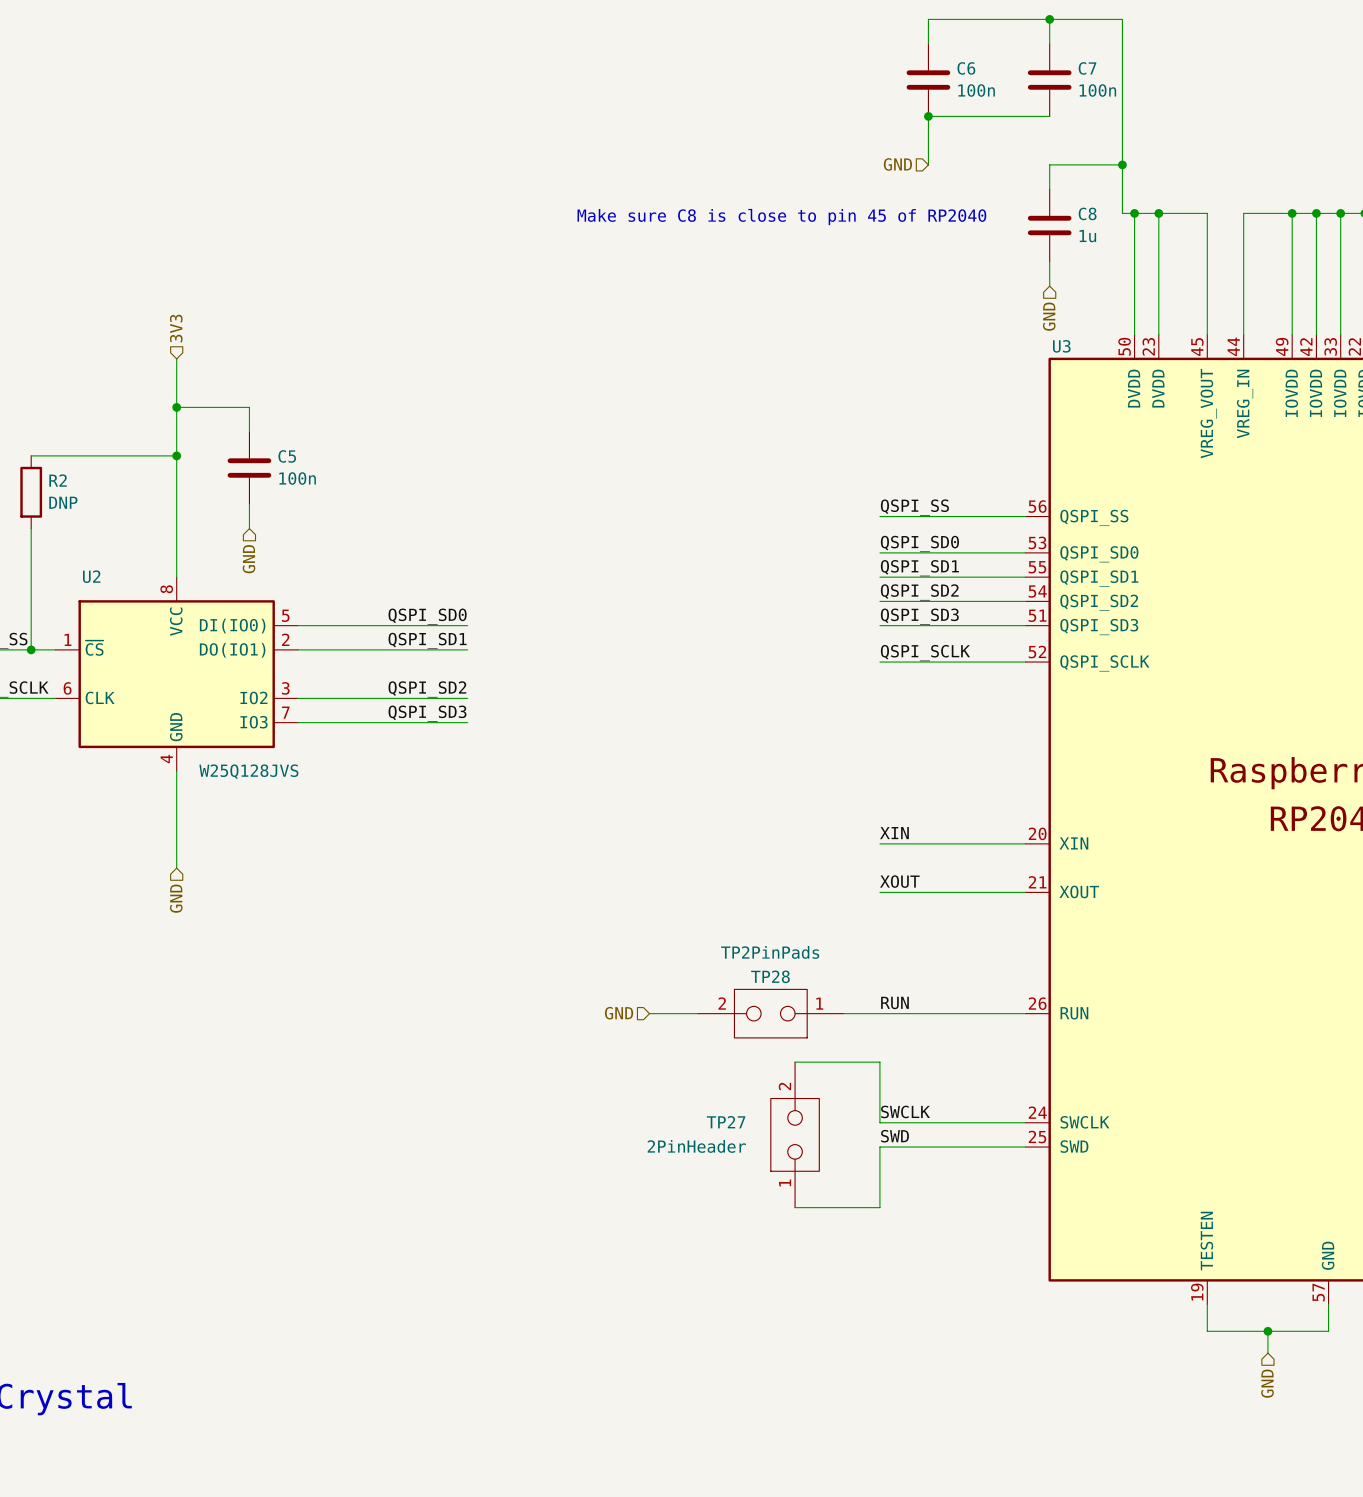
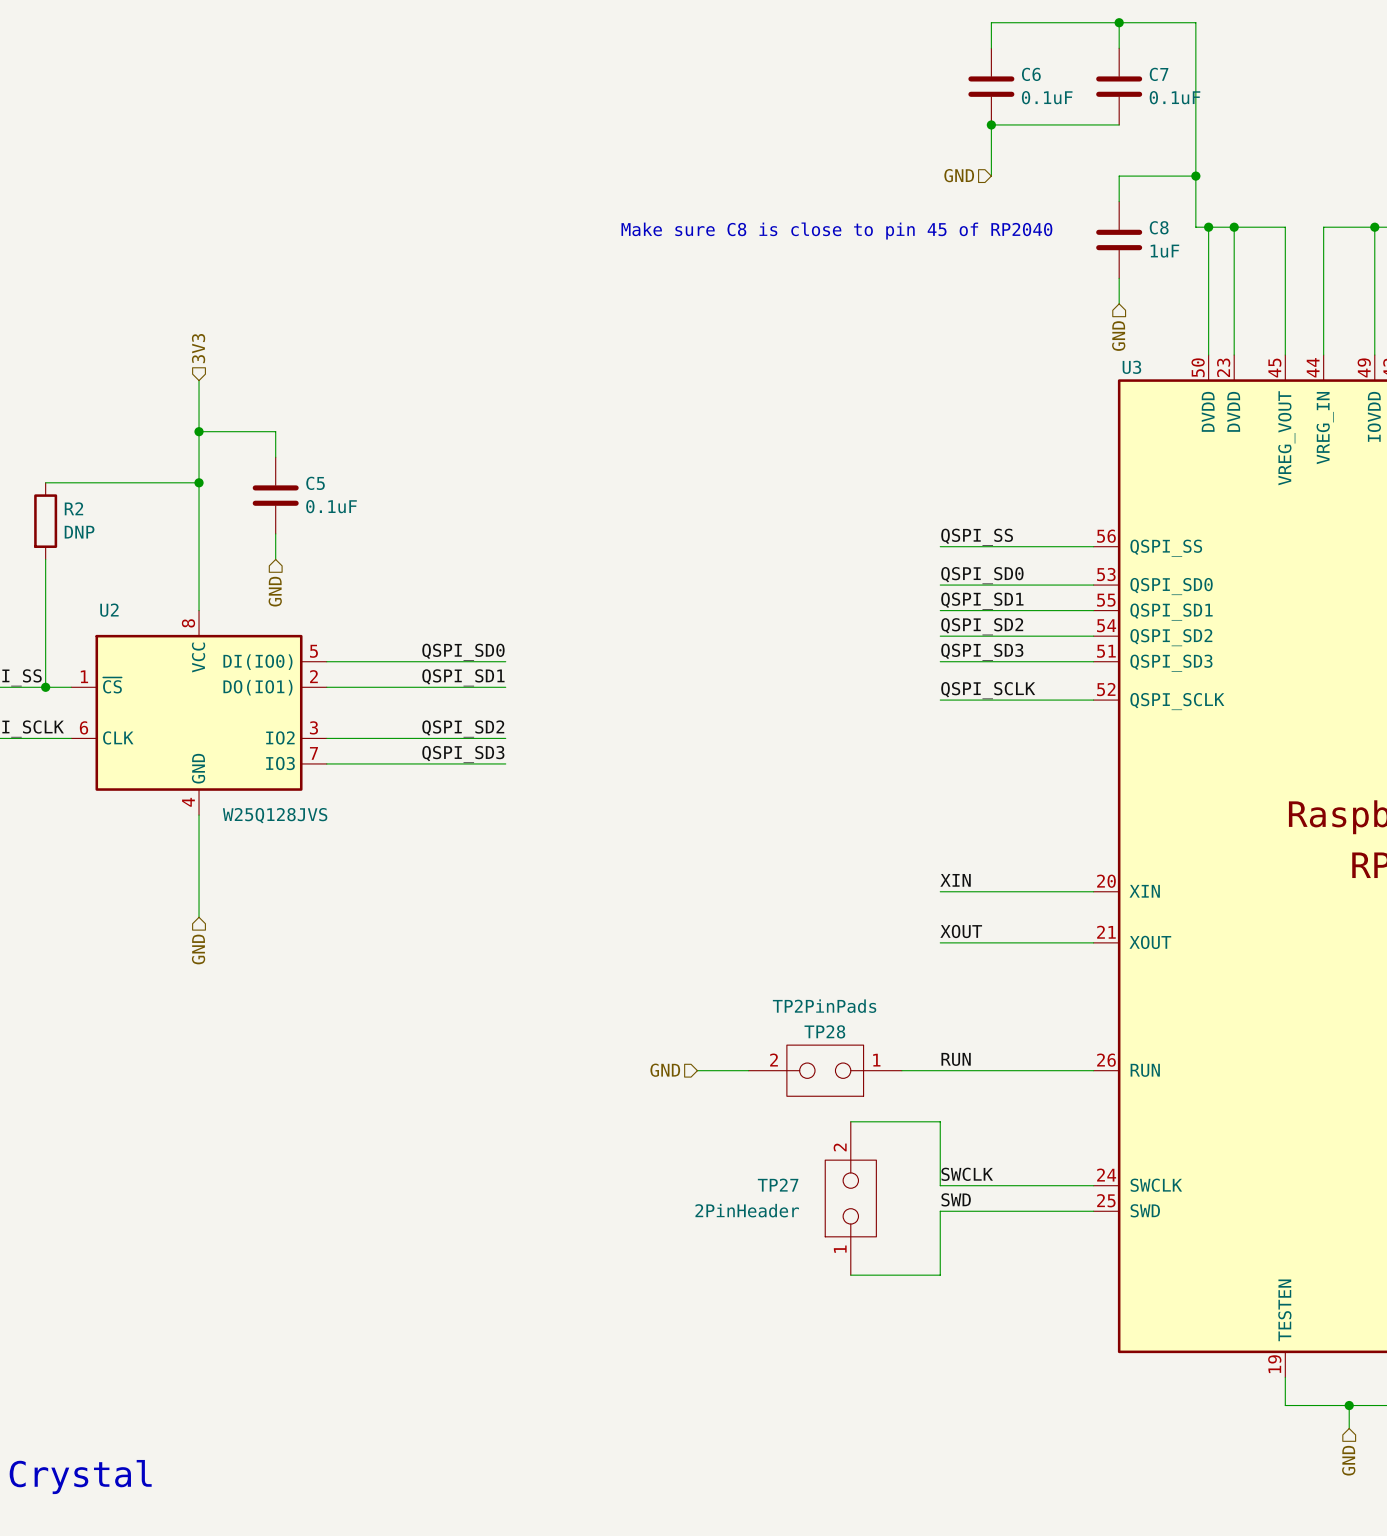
C6 value: 100n (976, 90) -> 0.1uF (1047, 97)
C7 value: 100n (1097, 90) -> 0.1uF (1175, 97)
C8 value: 1u (1087, 236) -> 1uF (1164, 251)
C5 value: 100n (297, 478) -> 0.1uF (331, 506)

